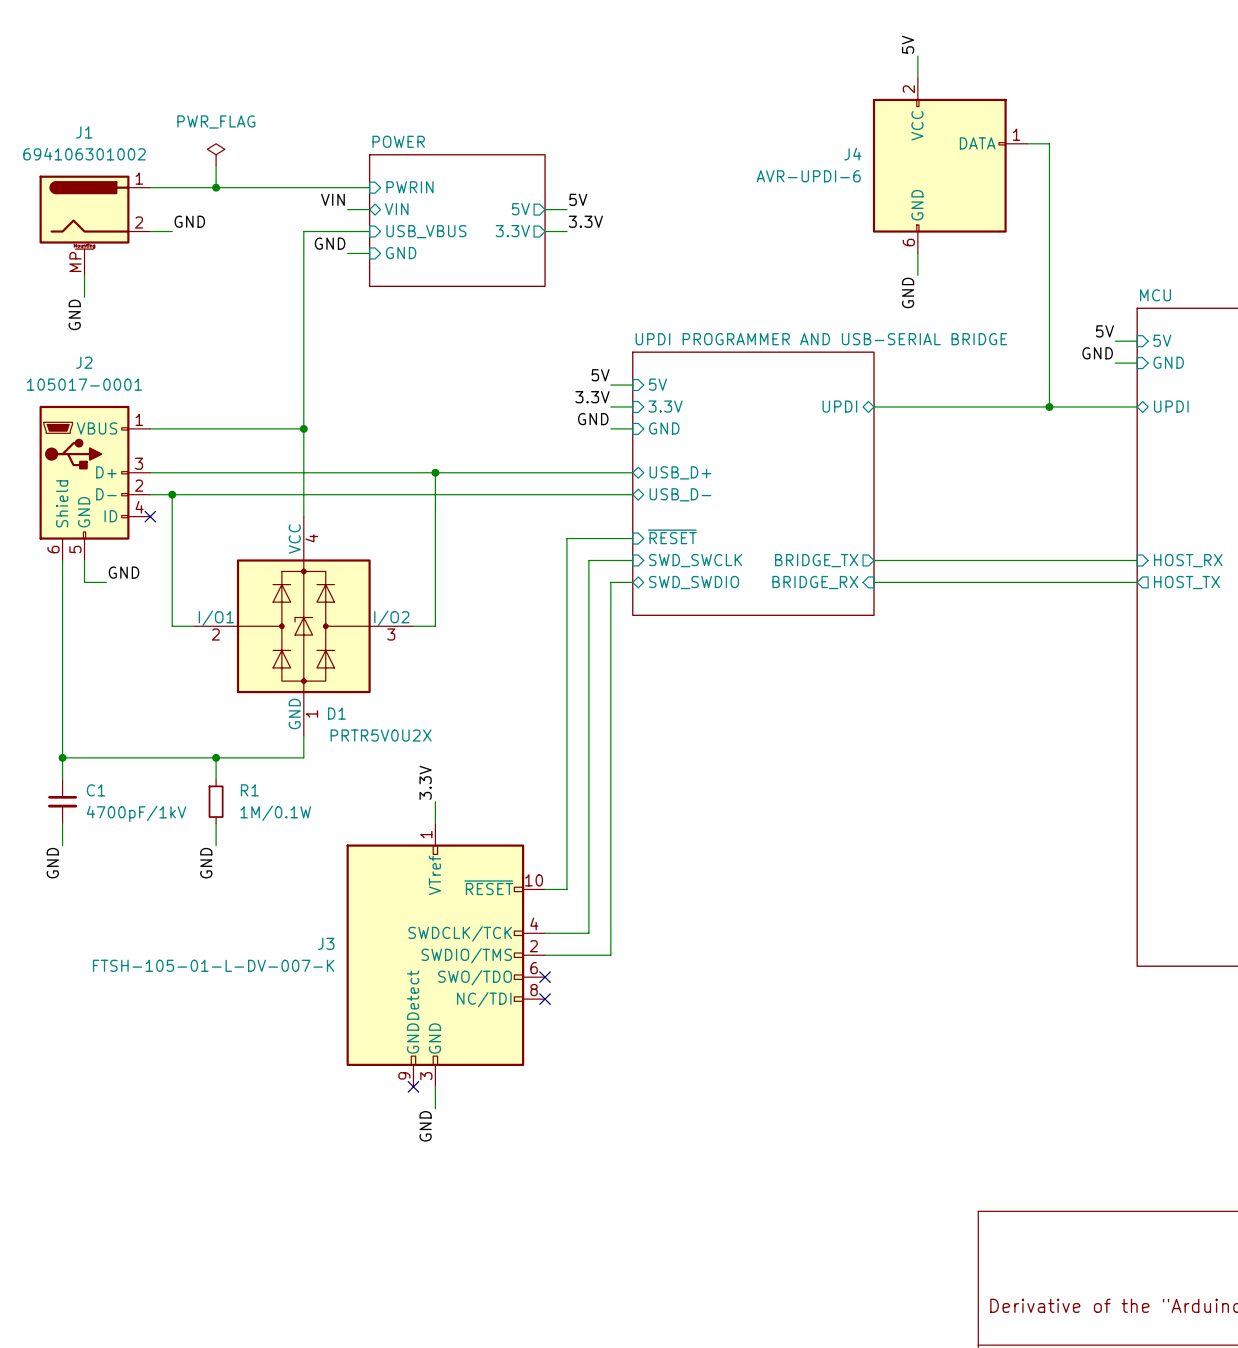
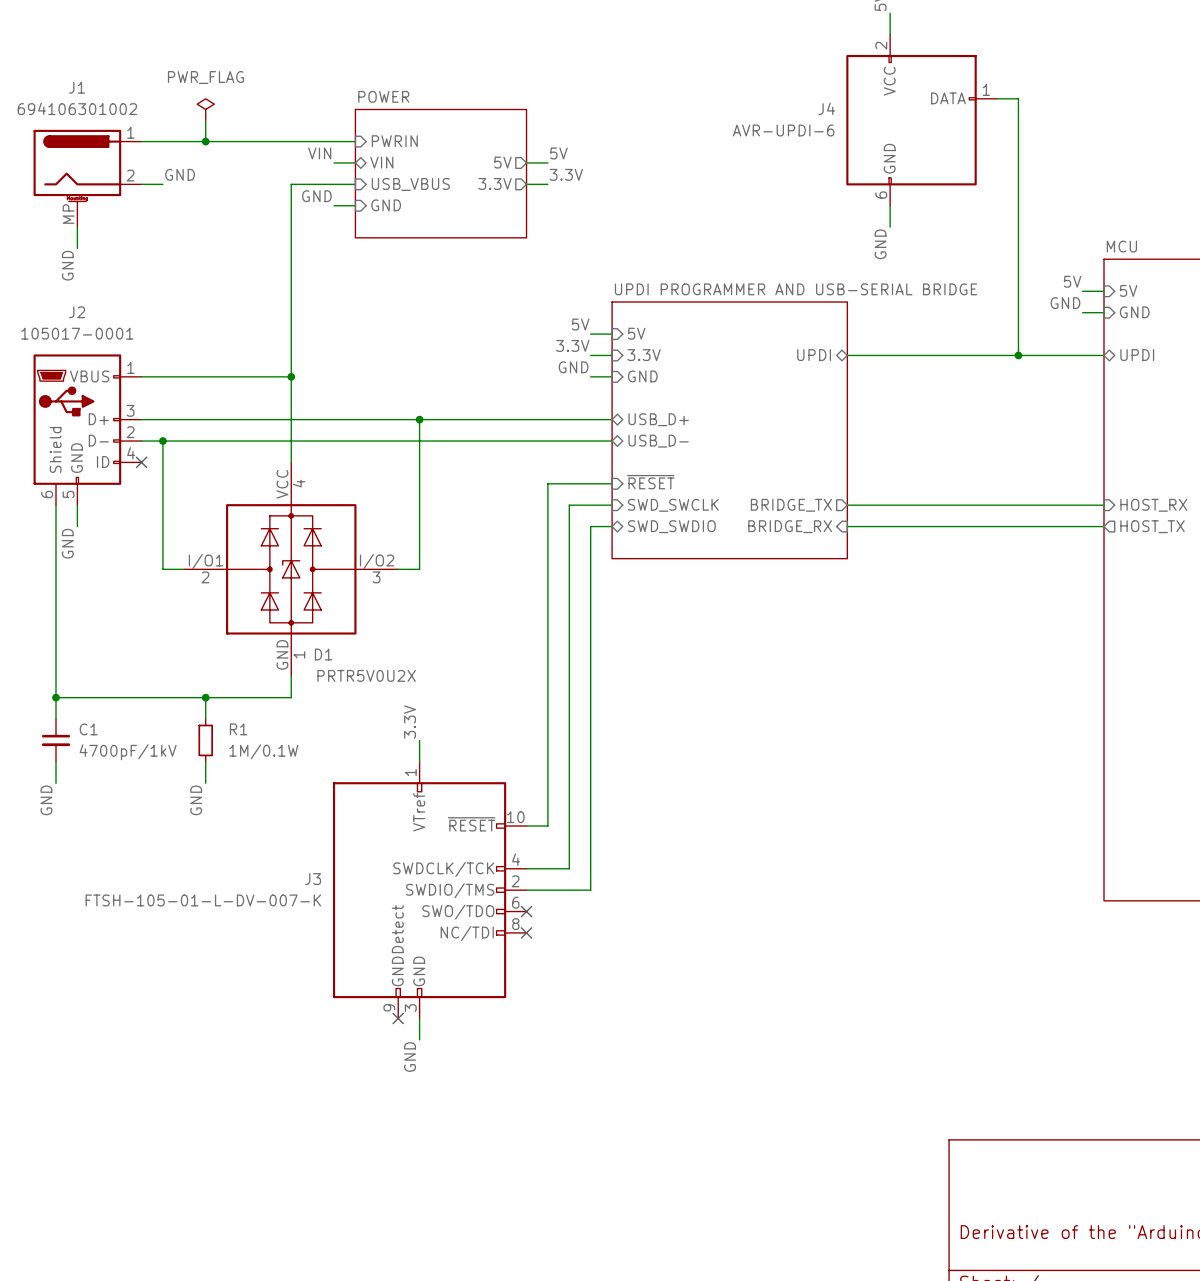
label rotation: 0° (124, 572) -> 90° counterclockwise (67, 543)
label position: GND (124, 572) -> GND (67, 543)
wire: (84, 582) (106, 582) -> none

